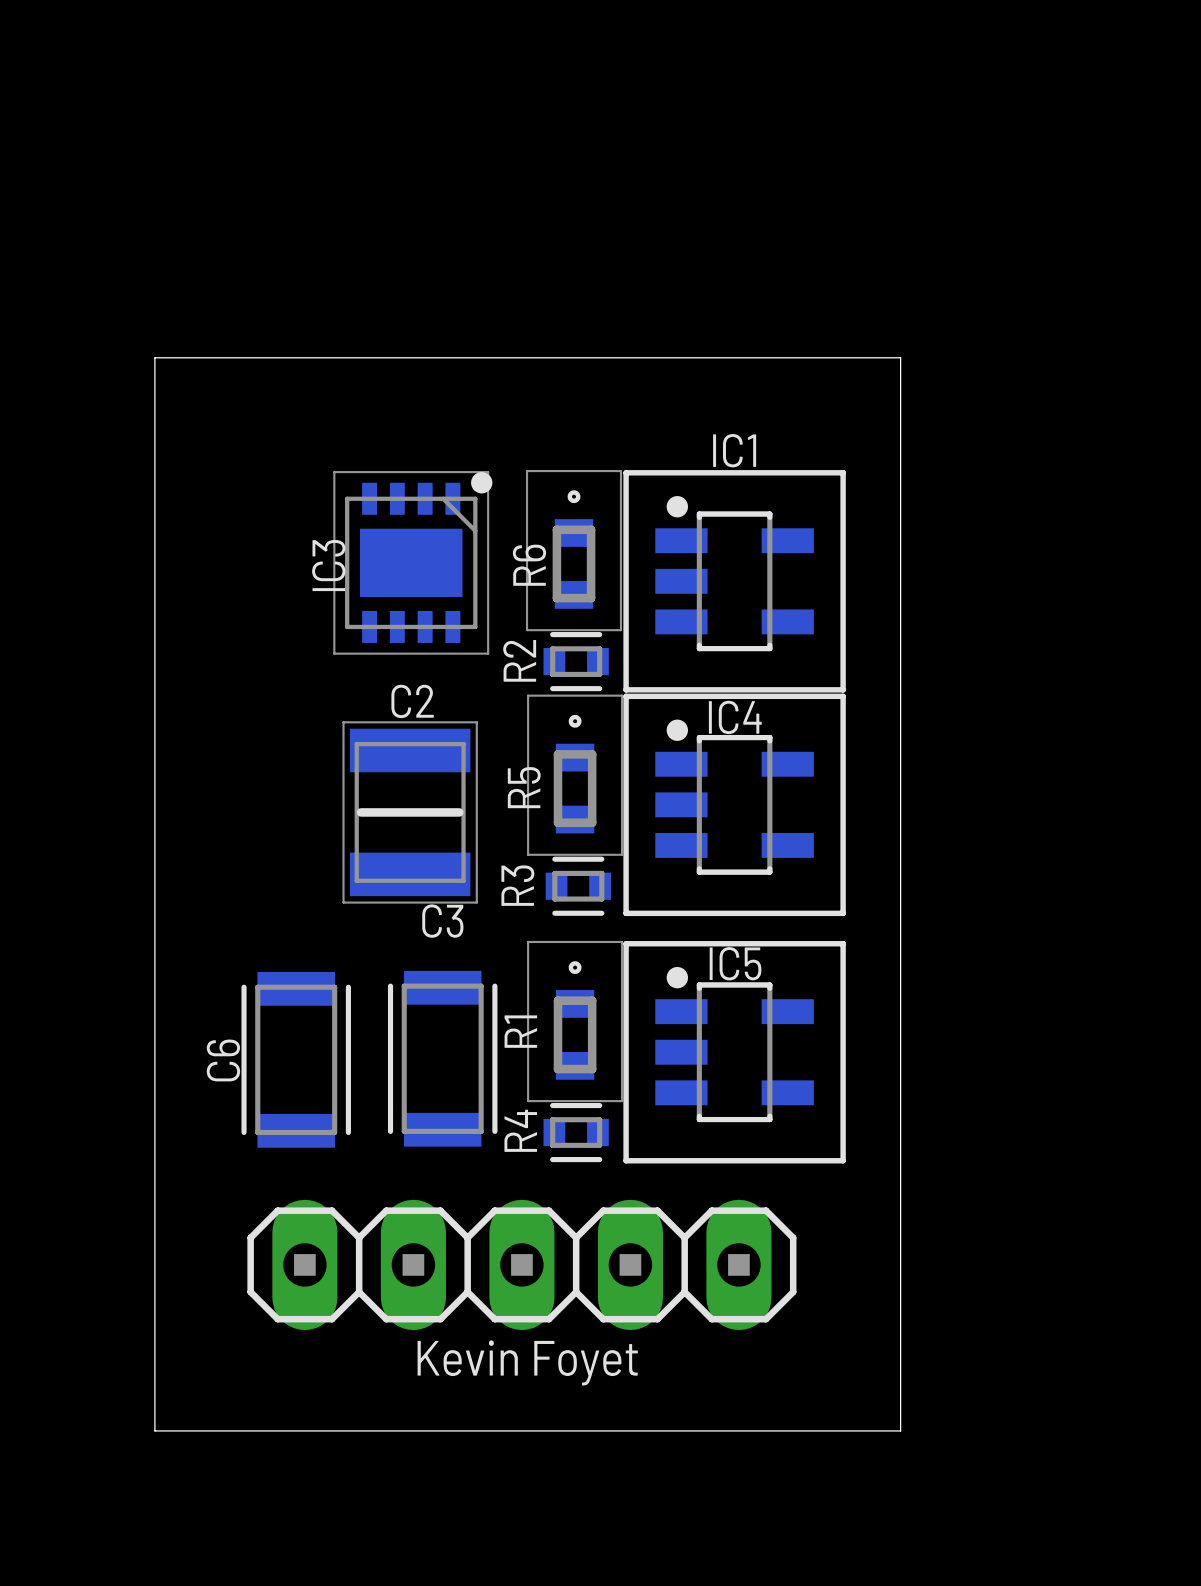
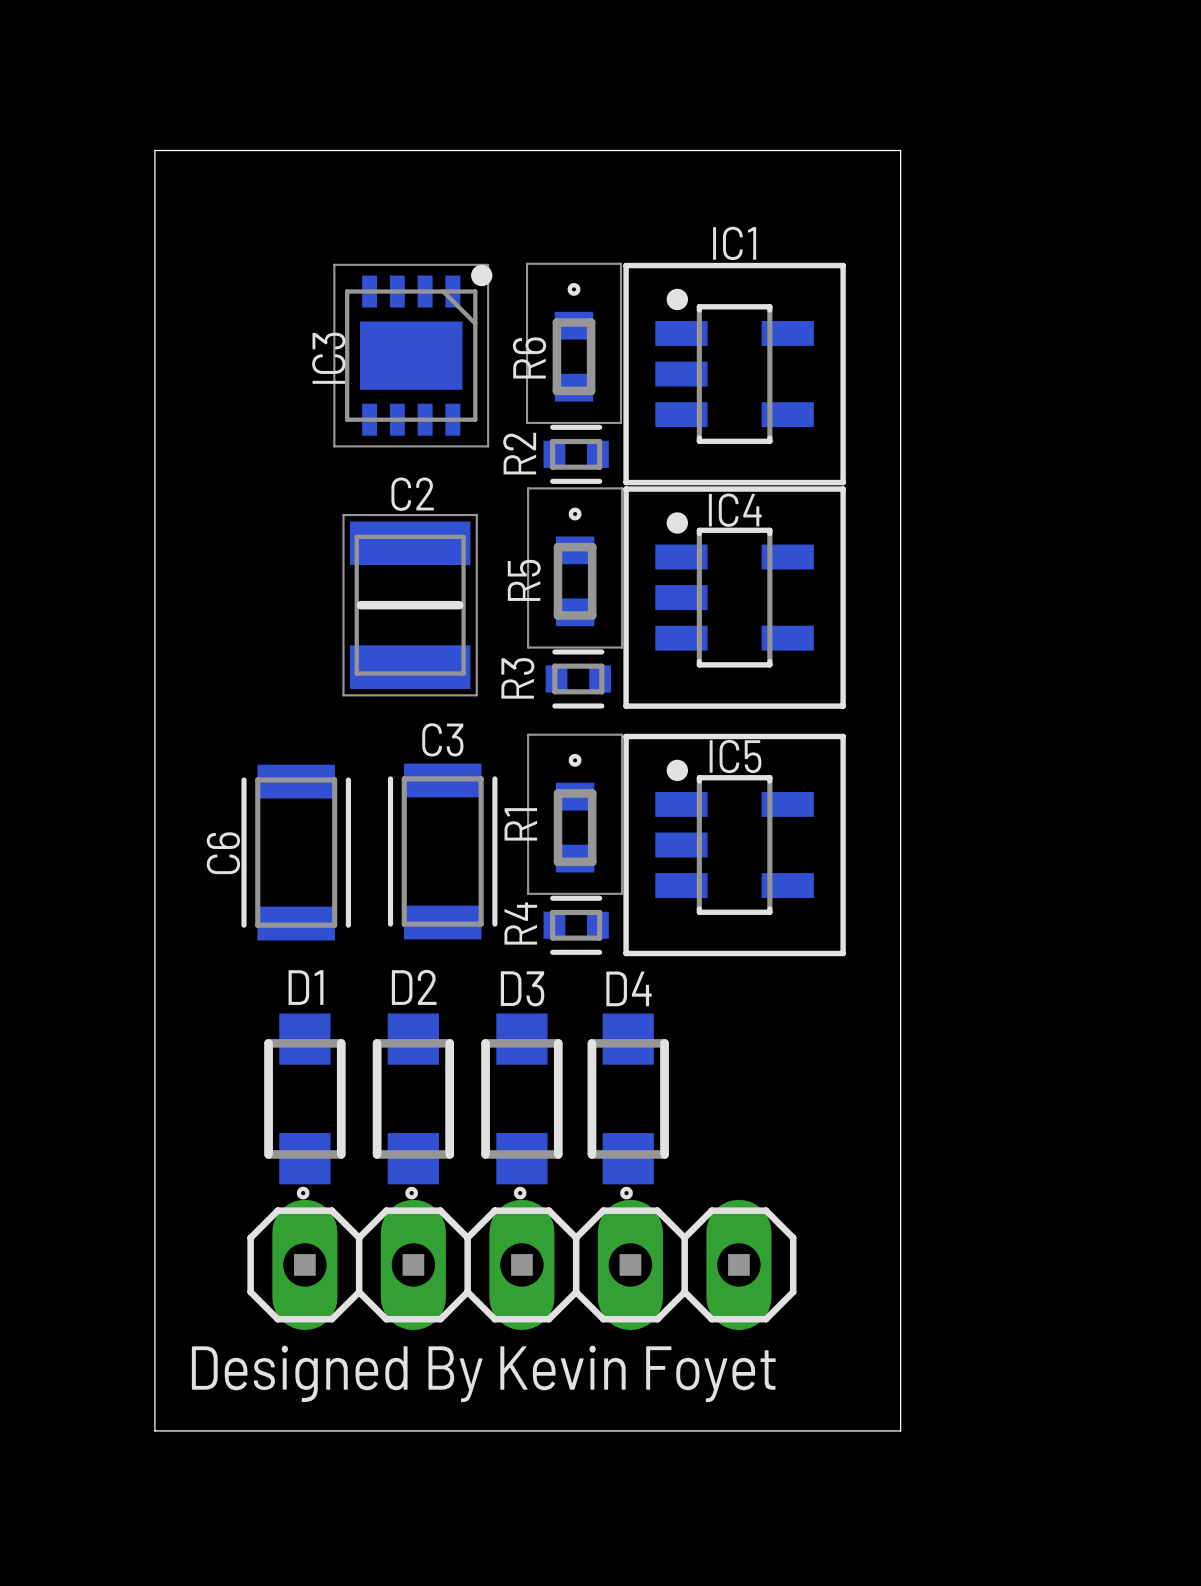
board edge: (900, 357) (154, 357) -> (900, 357) (900, 150) (154, 150) (154, 357)
R6 position: (574, 550) -> (574, 343)
IC3 position: (412, 562) -> (412, 355)
IC1 position: (734, 581) -> (734, 374)
R2 position: (576, 661) -> (576, 454)
R5 position: (575, 775) -> (575, 567)
IC4 position: (734, 804) -> (734, 597)
C2 position: (410, 812) -> (410, 605)
R3 position: (578, 886) -> (578, 678)
C3 name position: C3 (442, 921) -> C3 (442, 739)
R1 position: (575, 1021) -> (575, 814)
IC5 position: (734, 1052) -> (734, 844)
C3 position: (442, 1058) -> (442, 851)
C6 position: (296, 1059) -> (296, 852)
D1: none -> (304, 1106)
D2: none -> (413, 1106)
D3: none -> (521, 1106)
D4: none -> (628, 1106)
R4 position: (576, 1132) -> (576, 925)
text: Kevin Foyet (527, 1362) -> Designed By Kevin Foyet (483, 1373)

